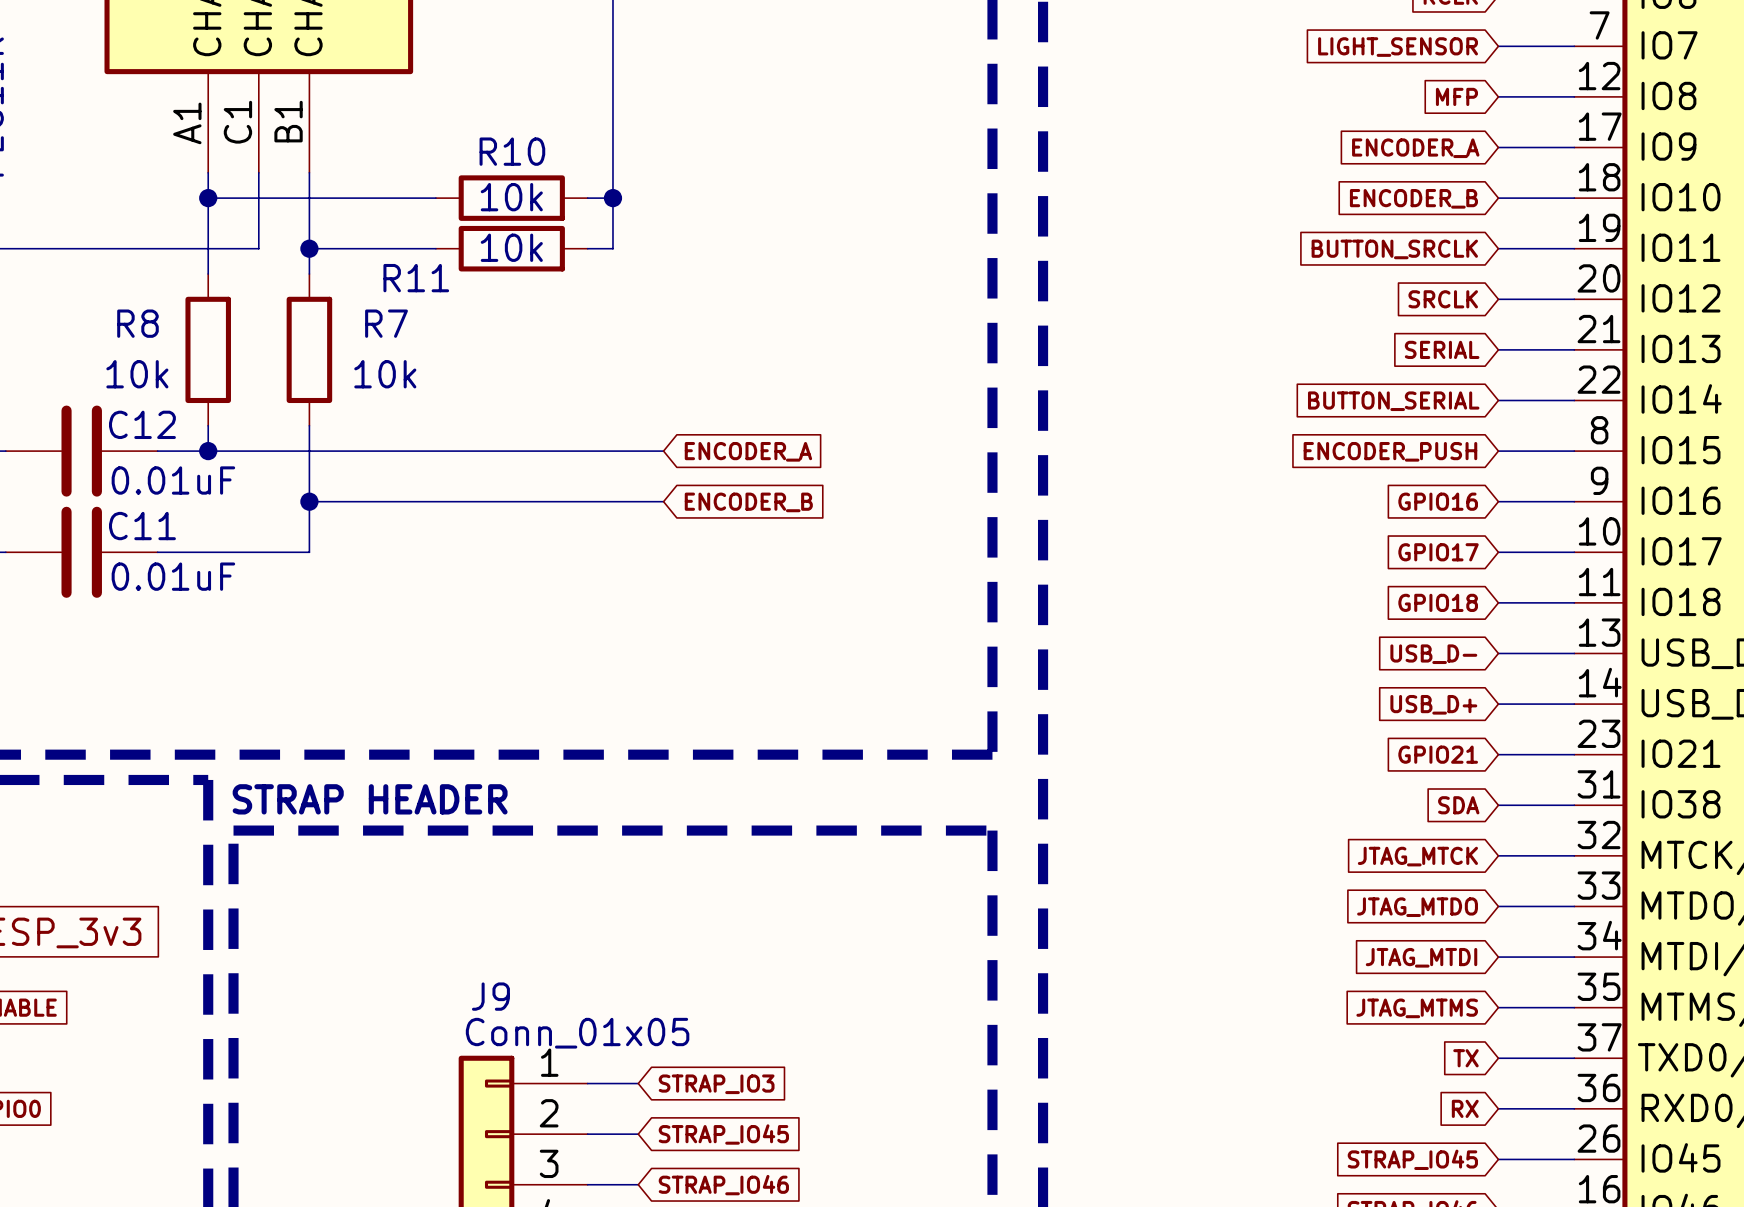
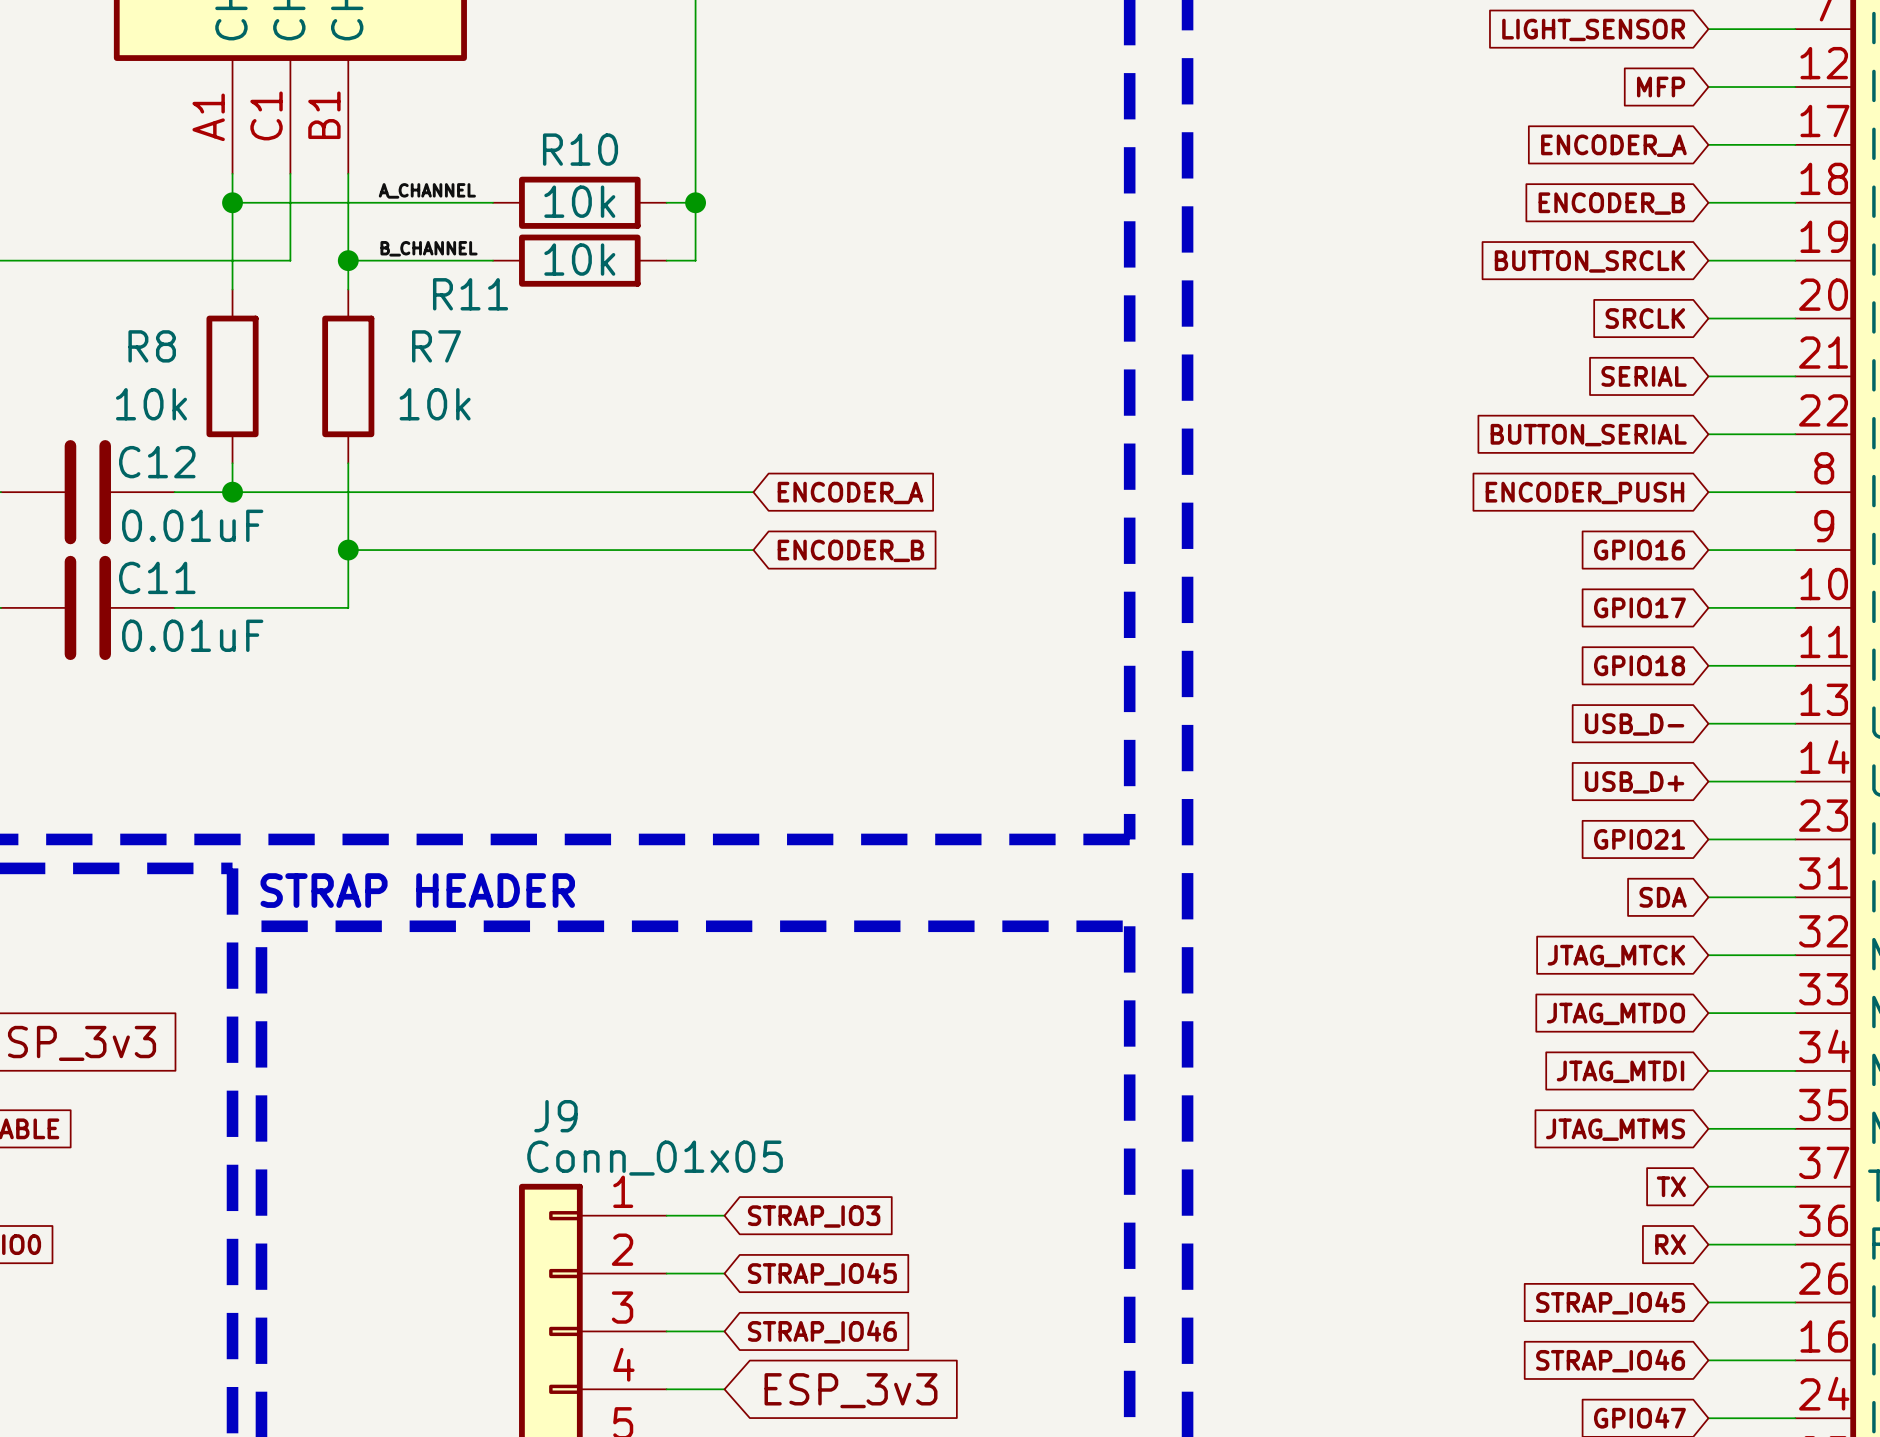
label: none -> A_CHANNEL (427, 190)
label: none -> B_CHANNEL (429, 248)

